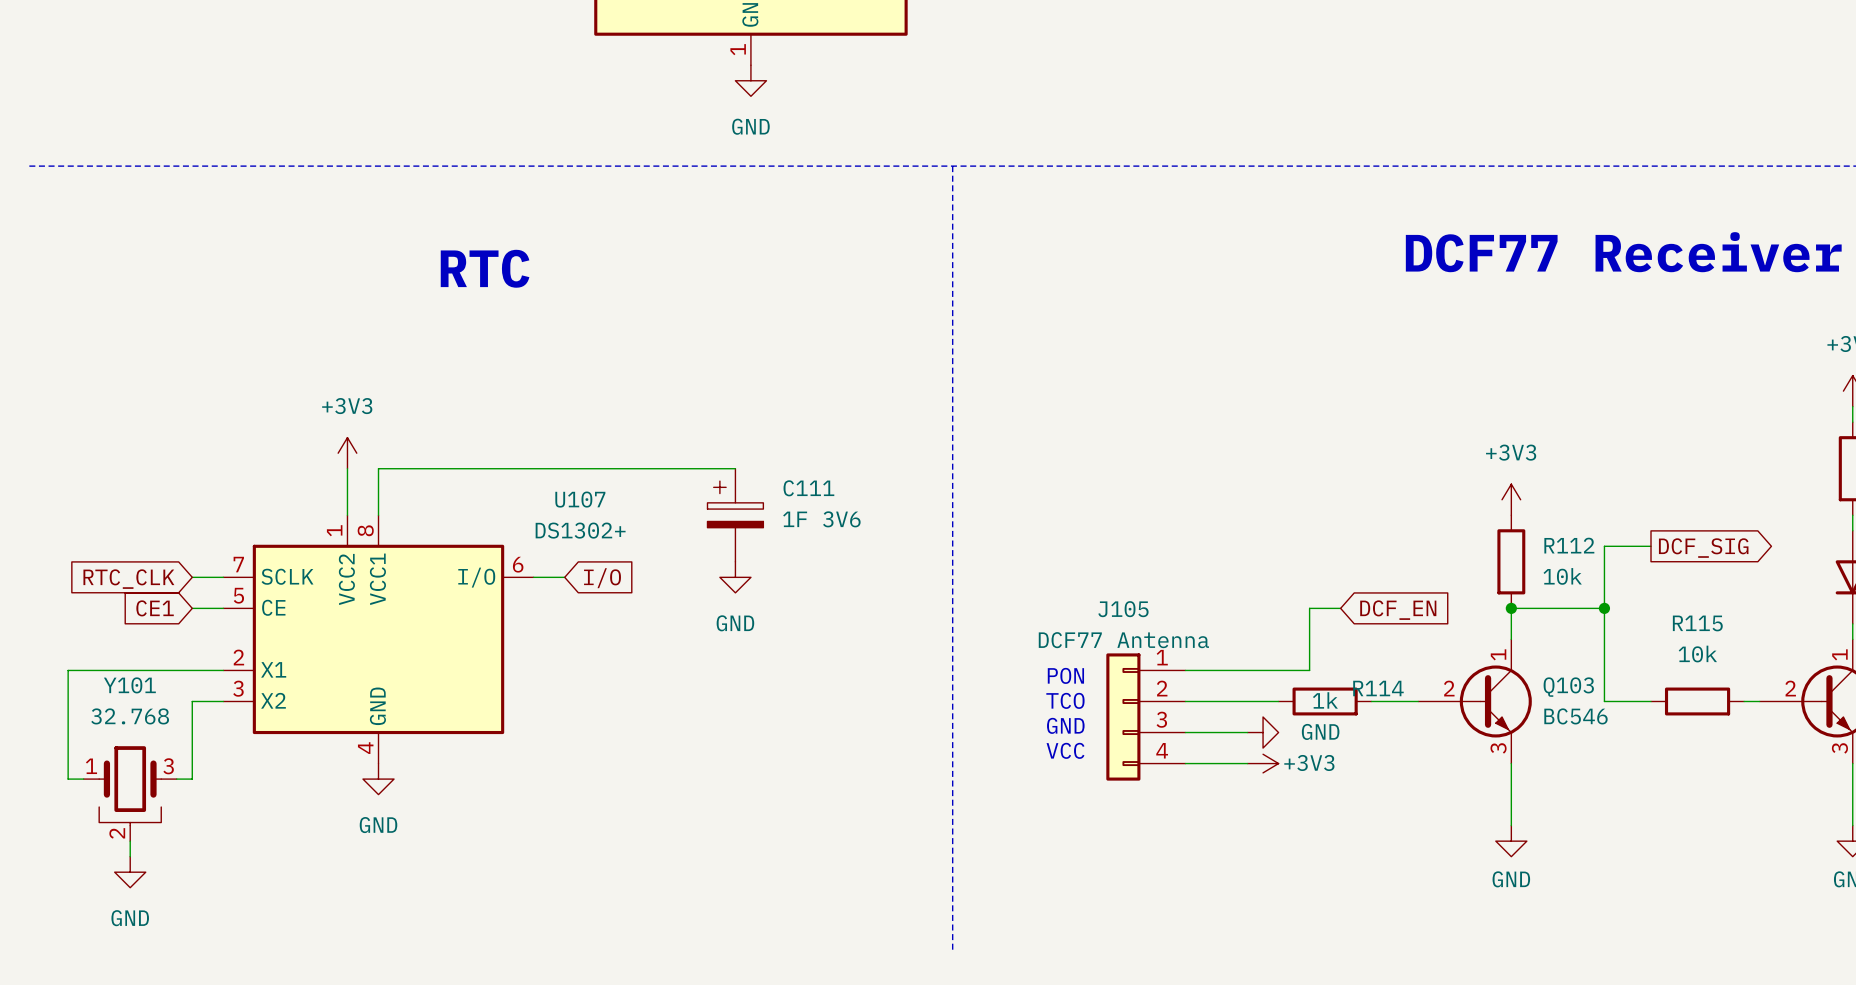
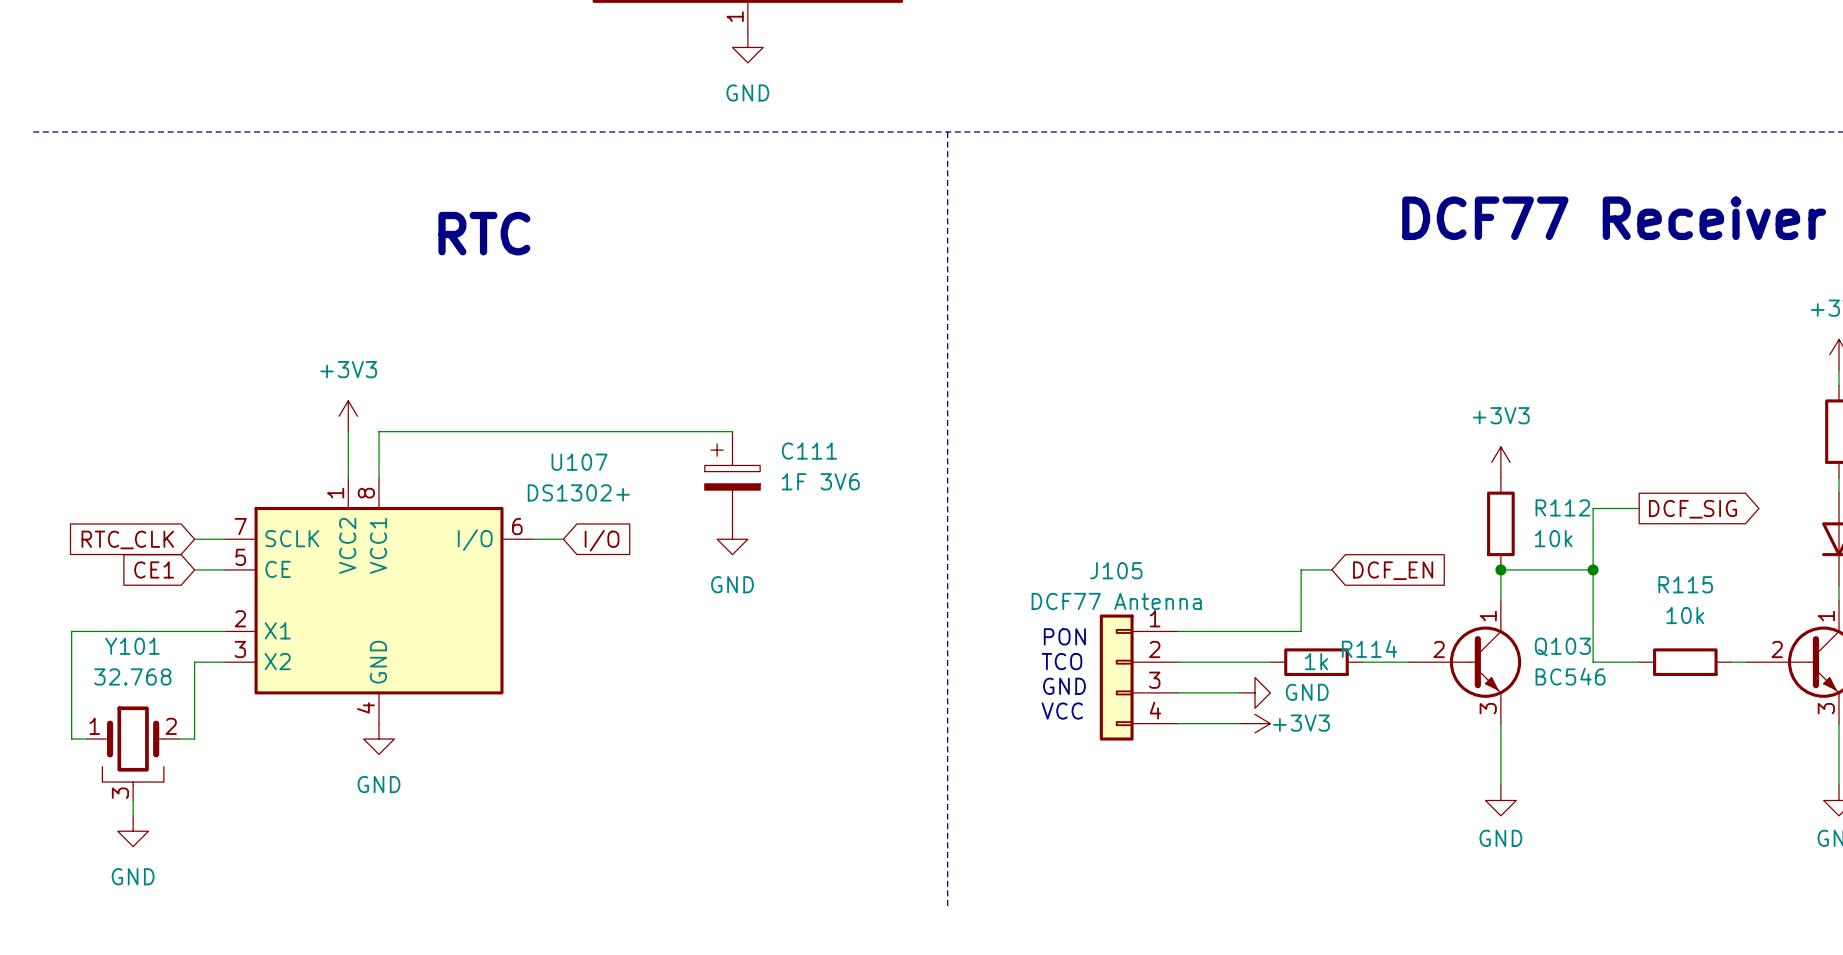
Y101 pin number: 3 (168, 766) -> 2 (171, 726)
Y101 pin number: 2 (117, 833) -> 3 (120, 793)

